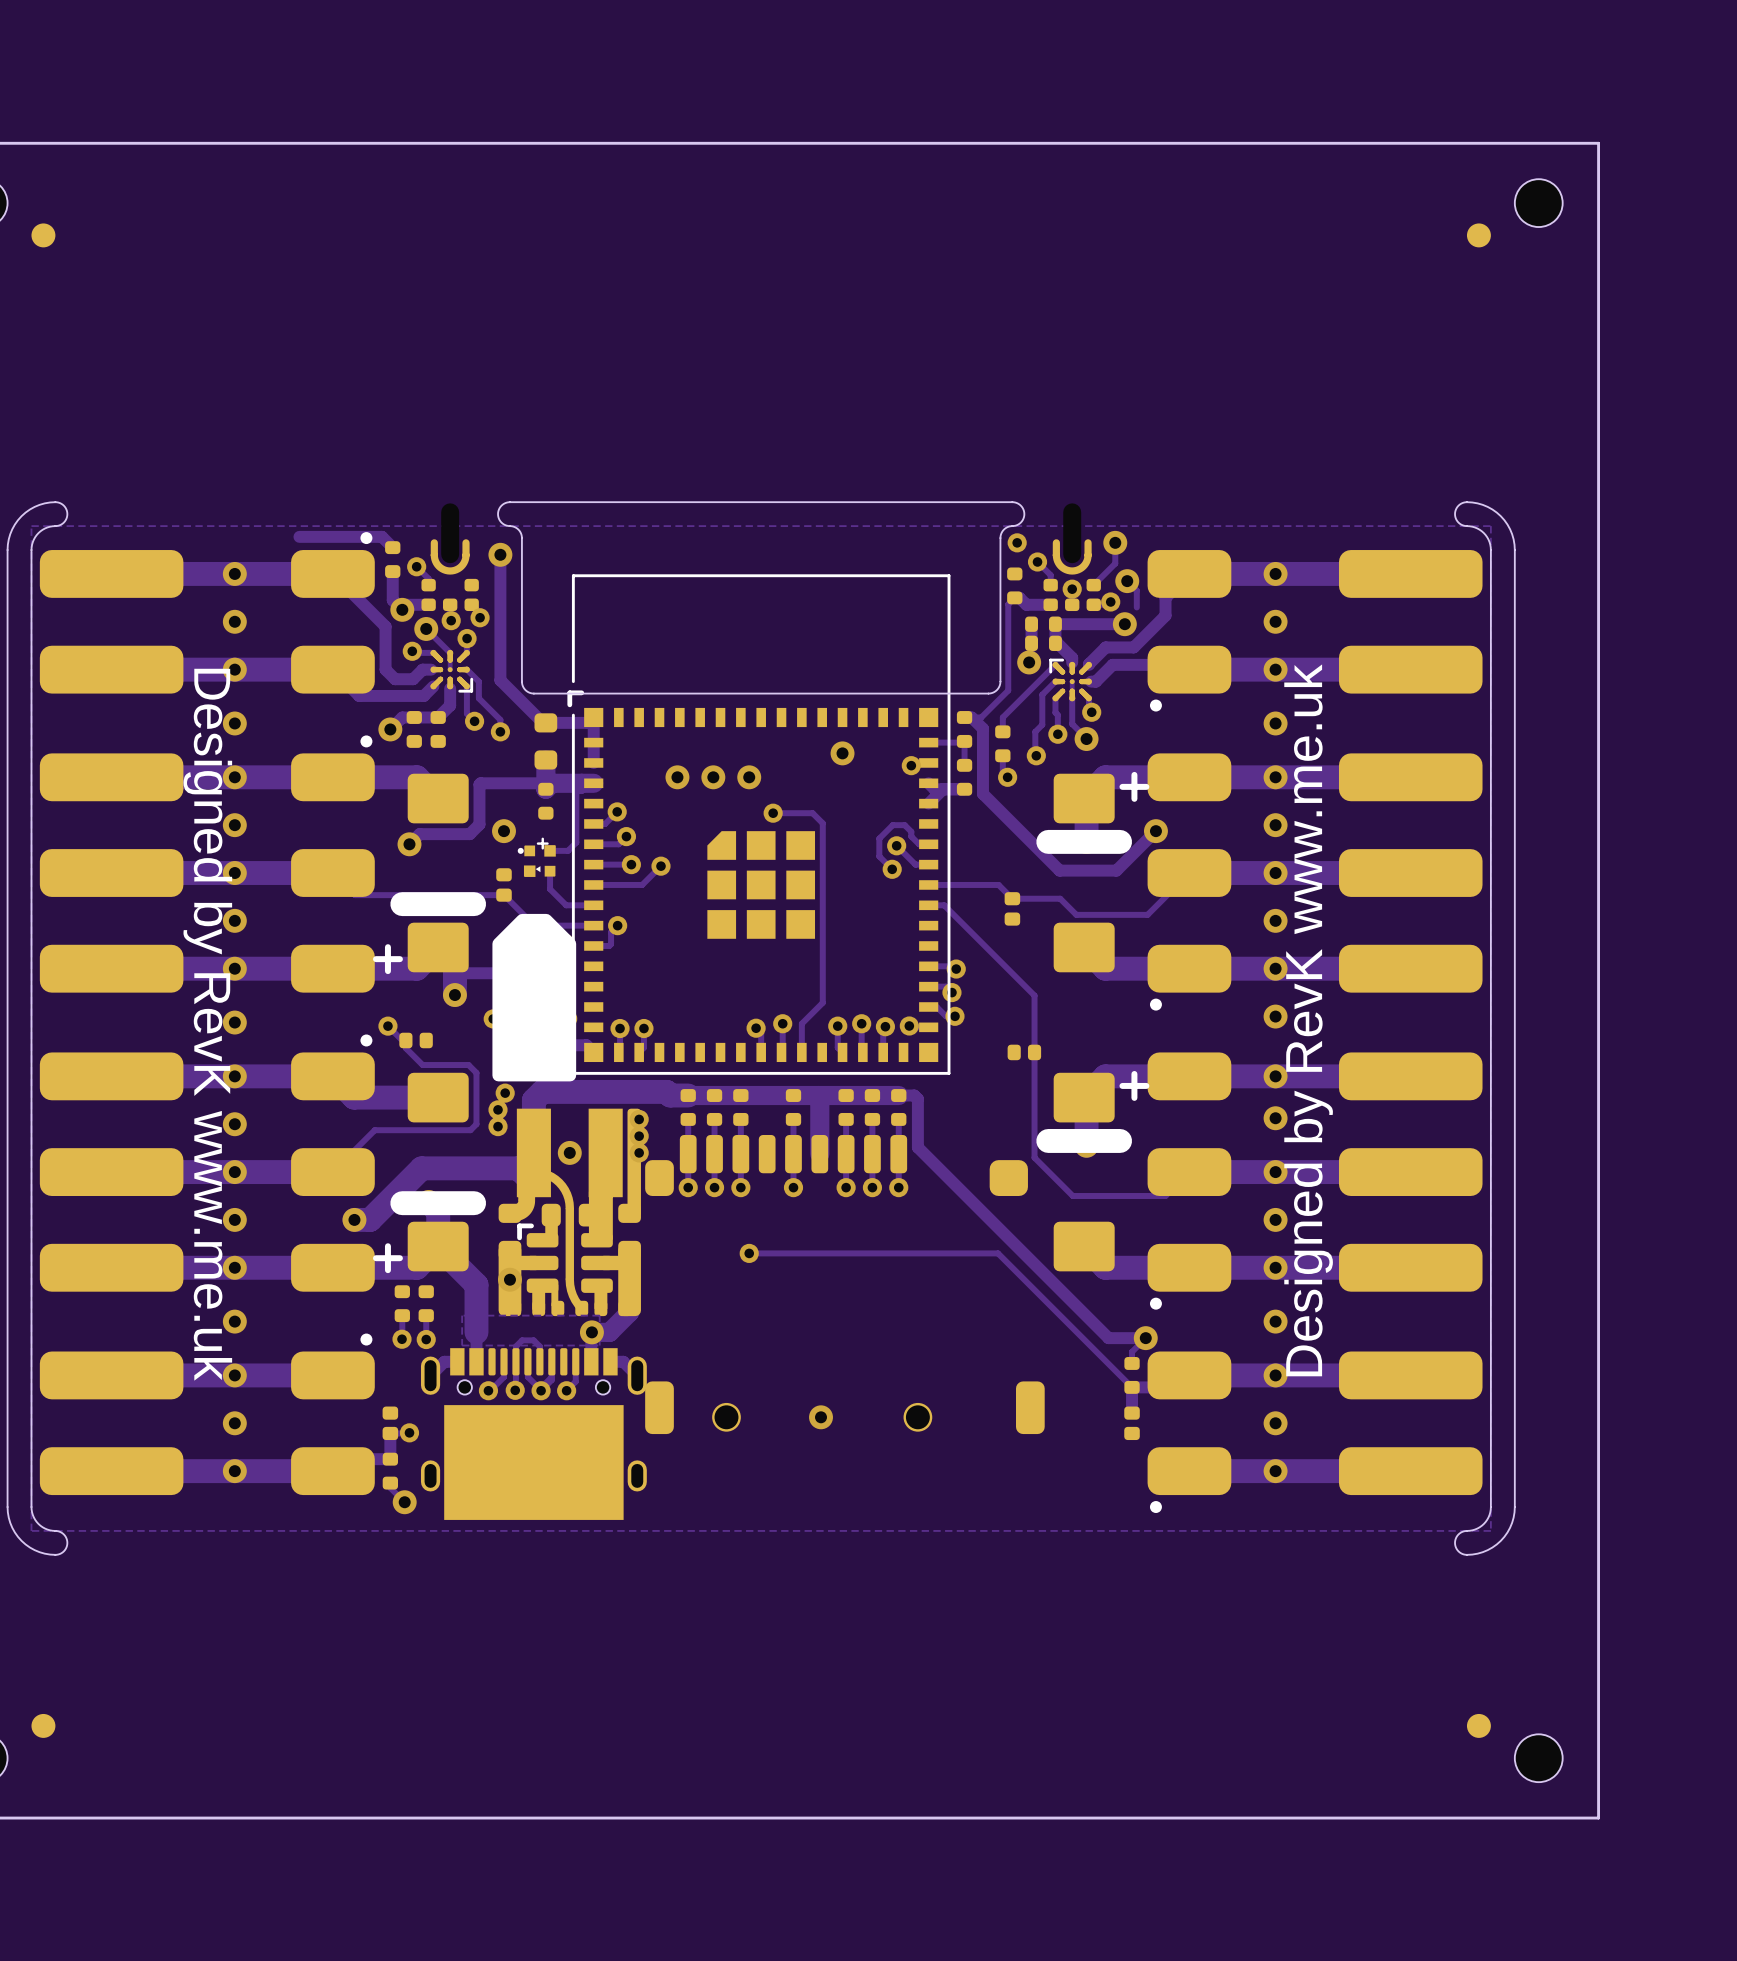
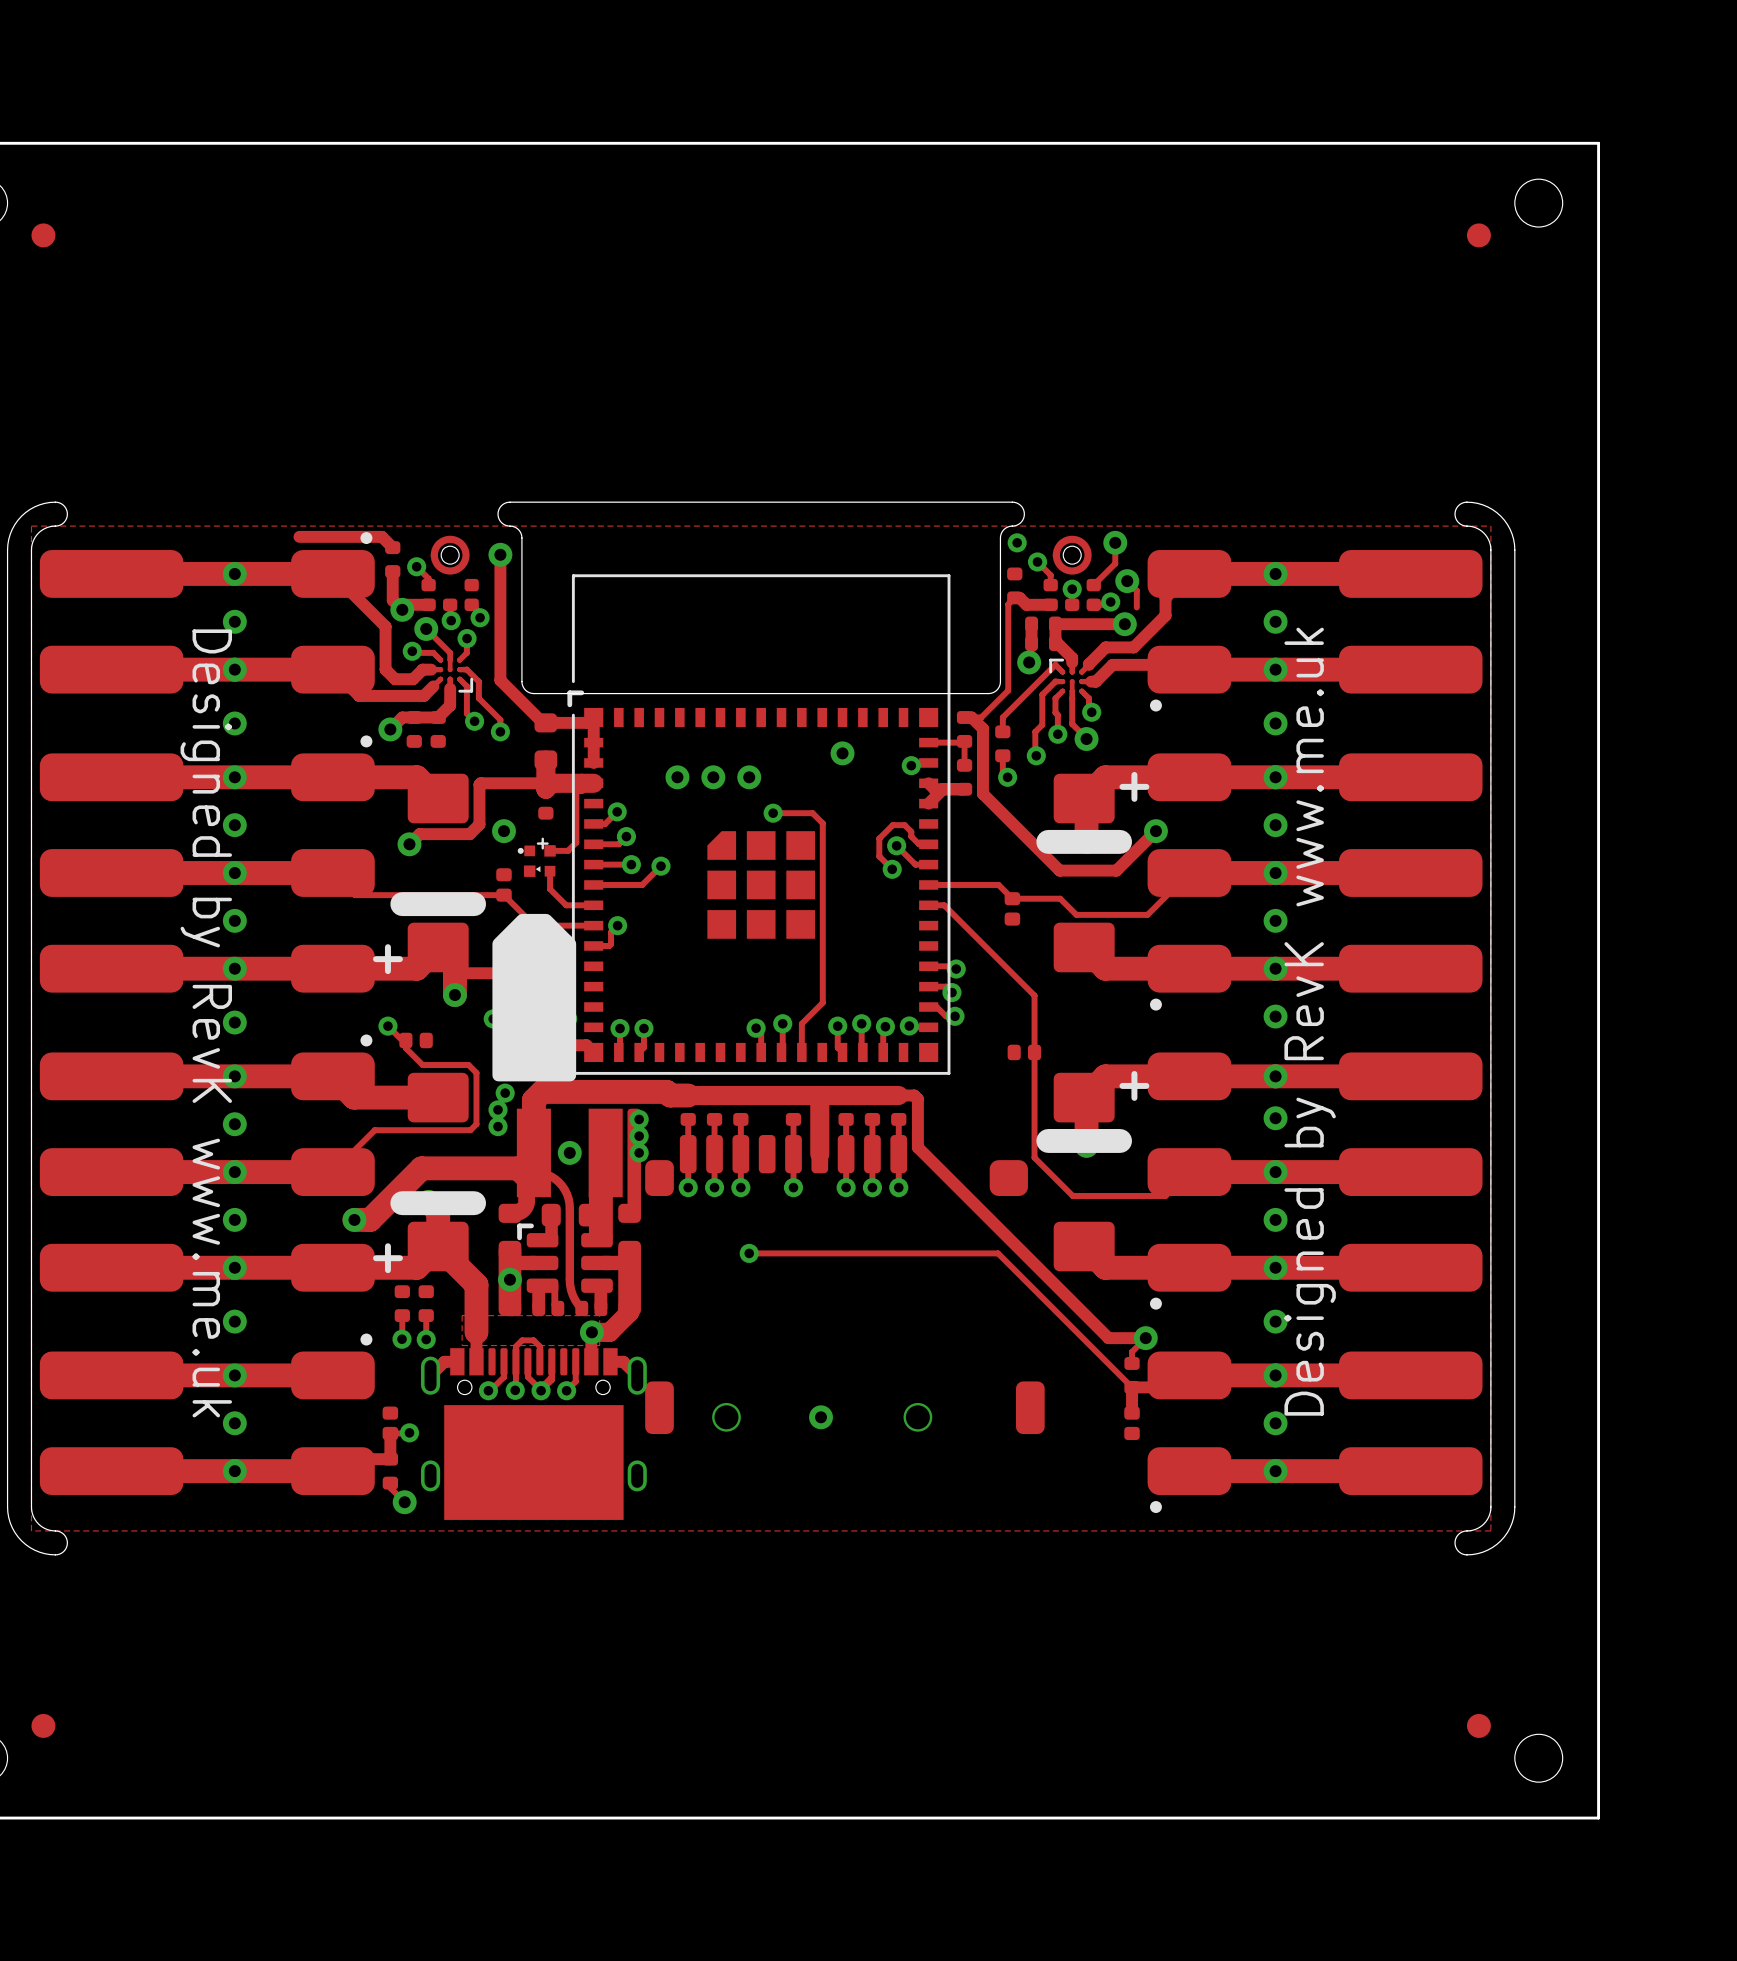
part footprint: [421, 503, 479, 612] -> [421, 535, 479, 612]
part footprint: [1043, 503, 1101, 612] -> [1043, 535, 1101, 612]

